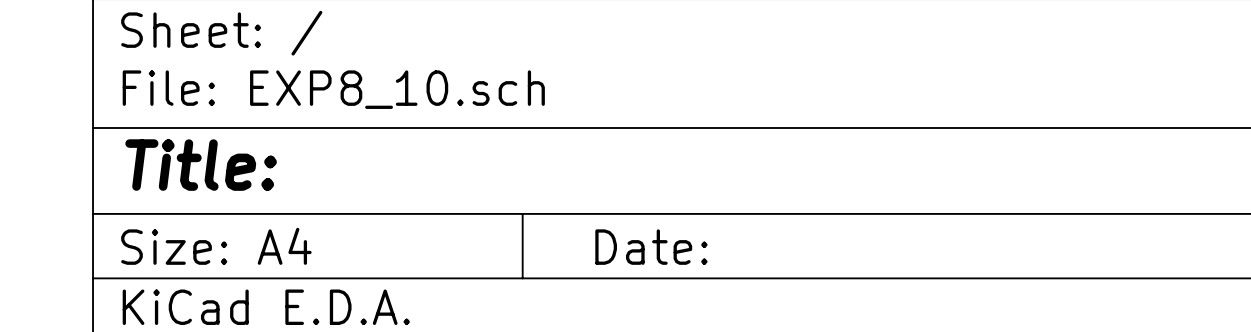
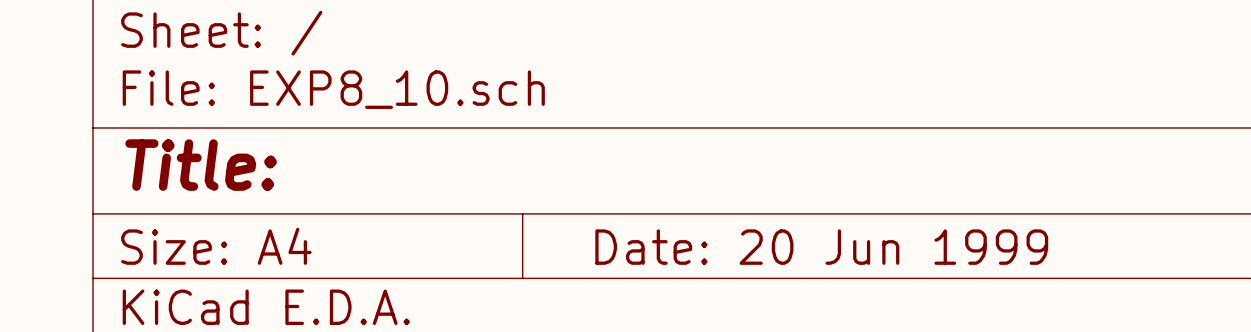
title block: Date: (651, 247) -> Date: 20 Jun 1999 (821, 247)

